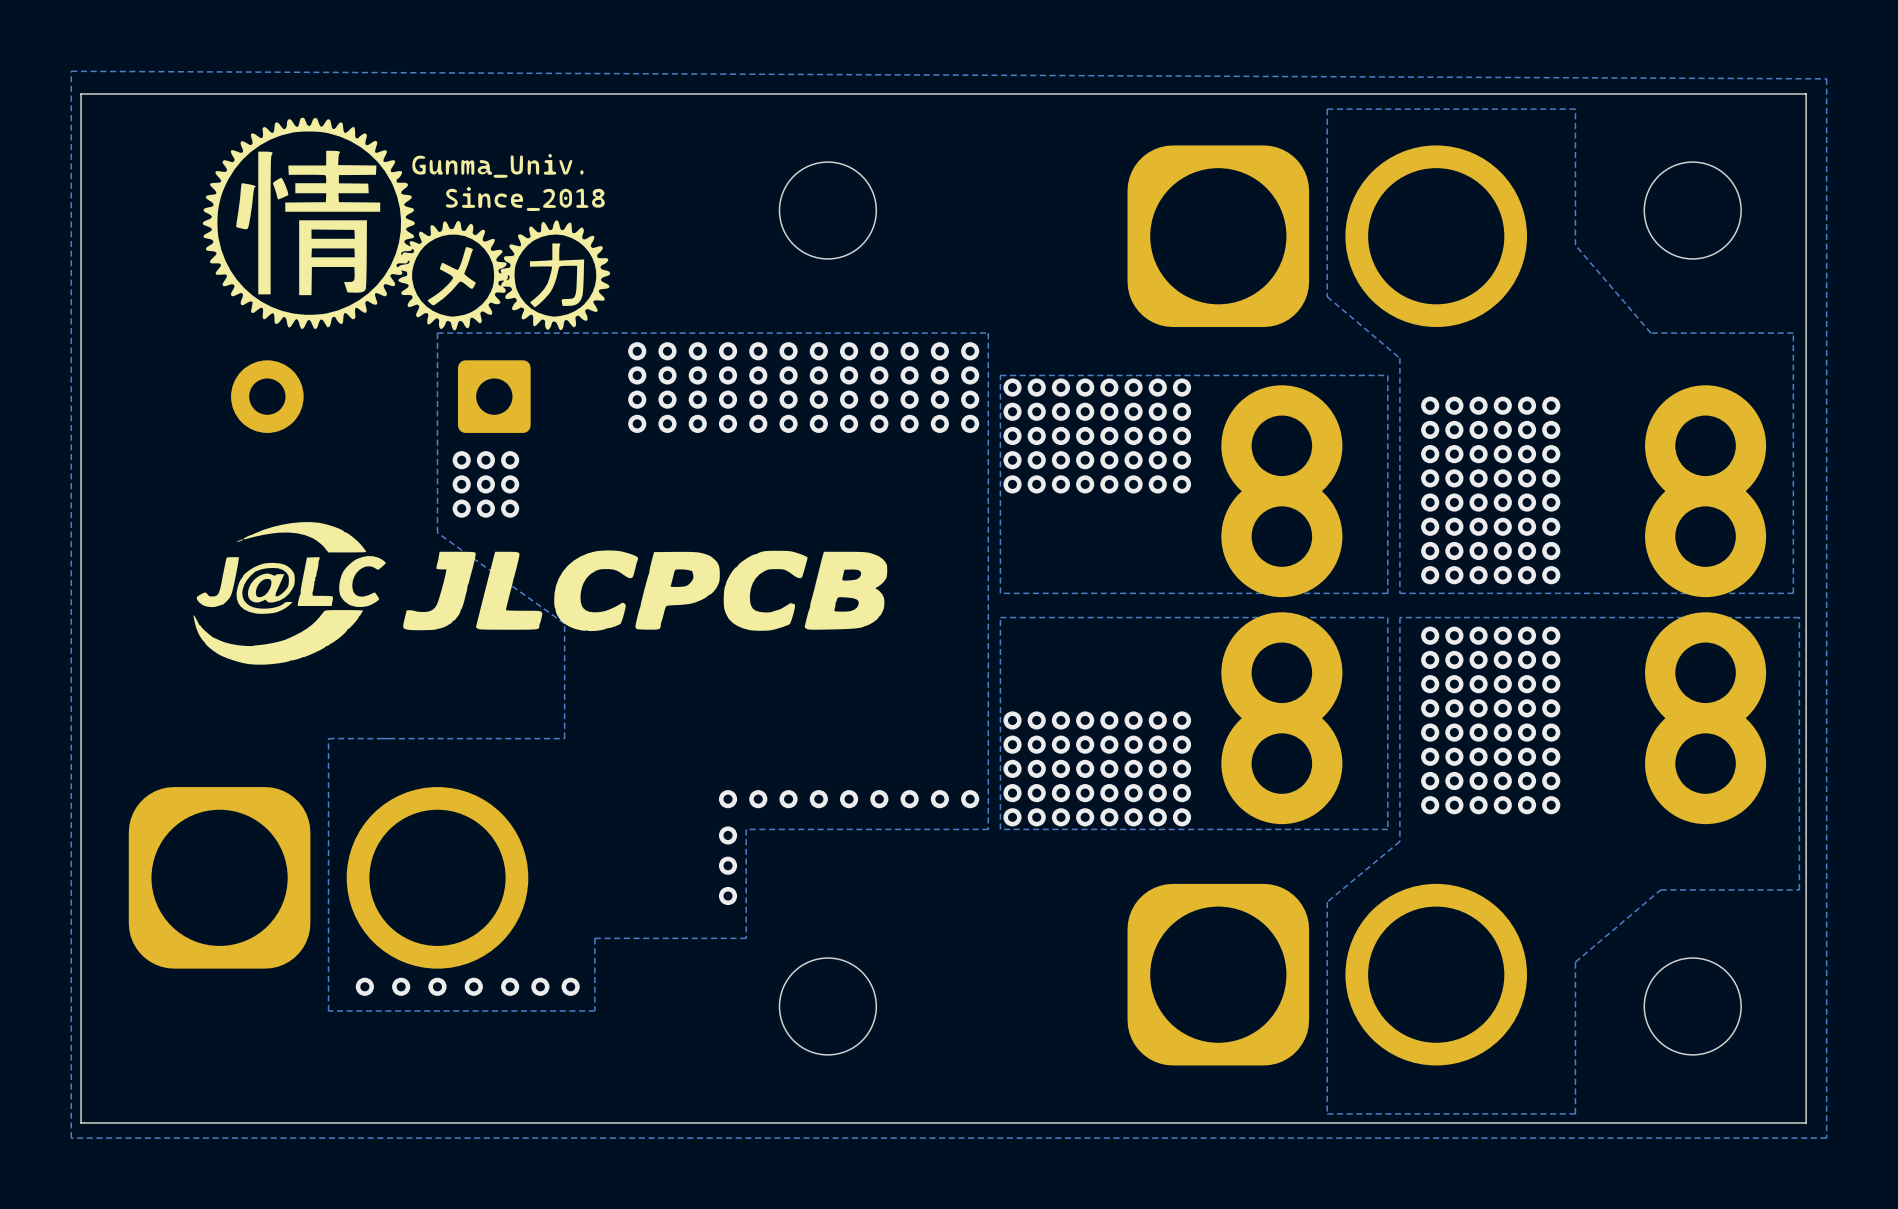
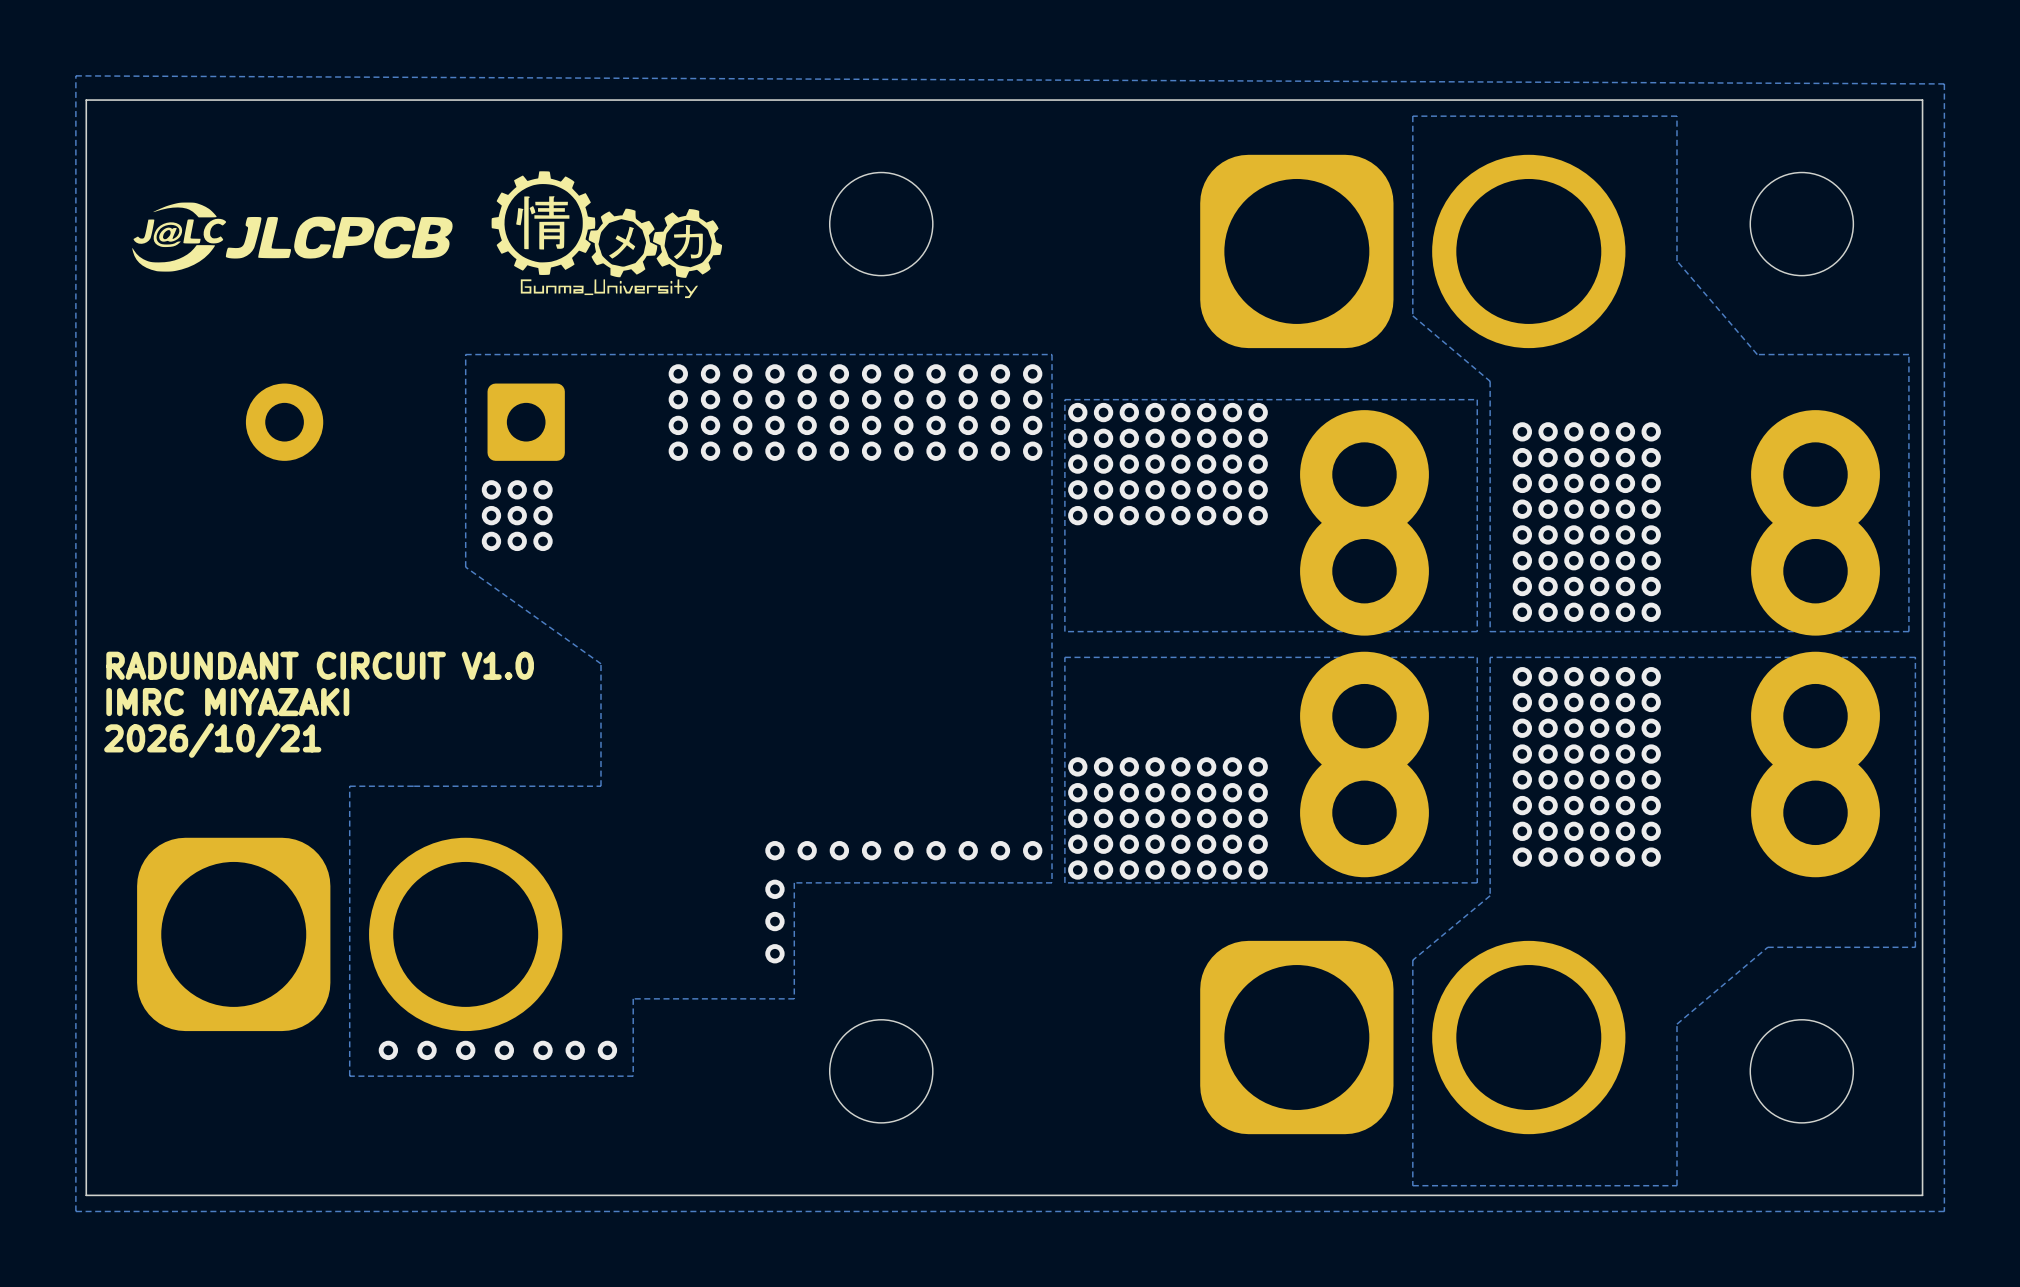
drawing: [202, 117, 611, 331] -> none
drawing: none -> [491, 171, 723, 299]
drawing: none -> [132, 202, 453, 272]
drawing: [193, 522, 888, 665] -> none
text: none -> RADUNDANT CIRCUIT V1.0 (320, 665)
text: none -> IMRC MIYAZAKI (227, 702)
text: none -> 2026/10/21 (212, 740)

